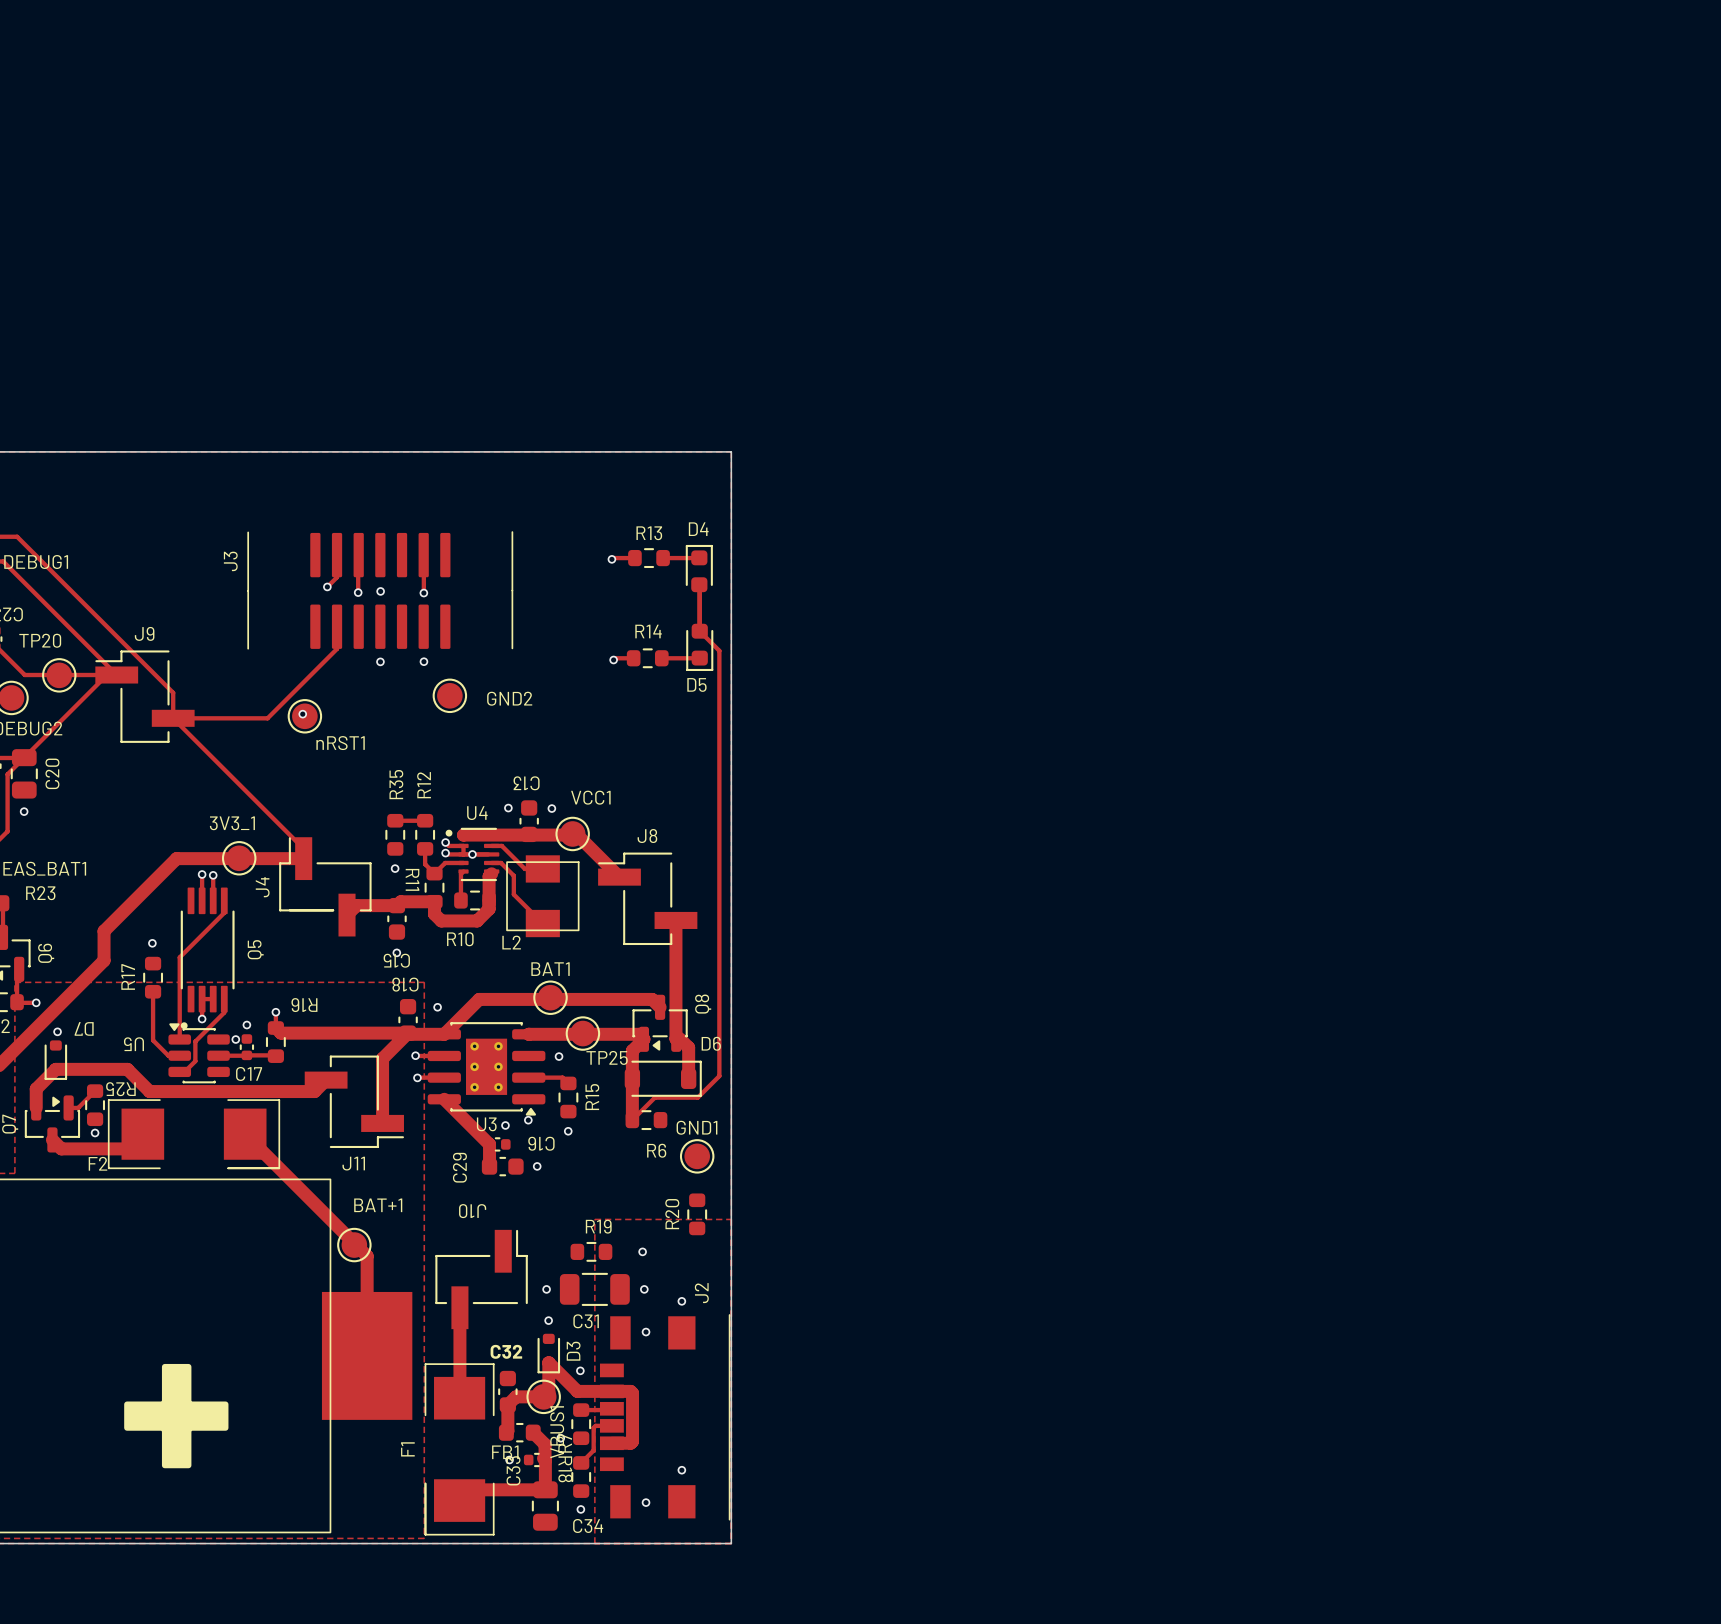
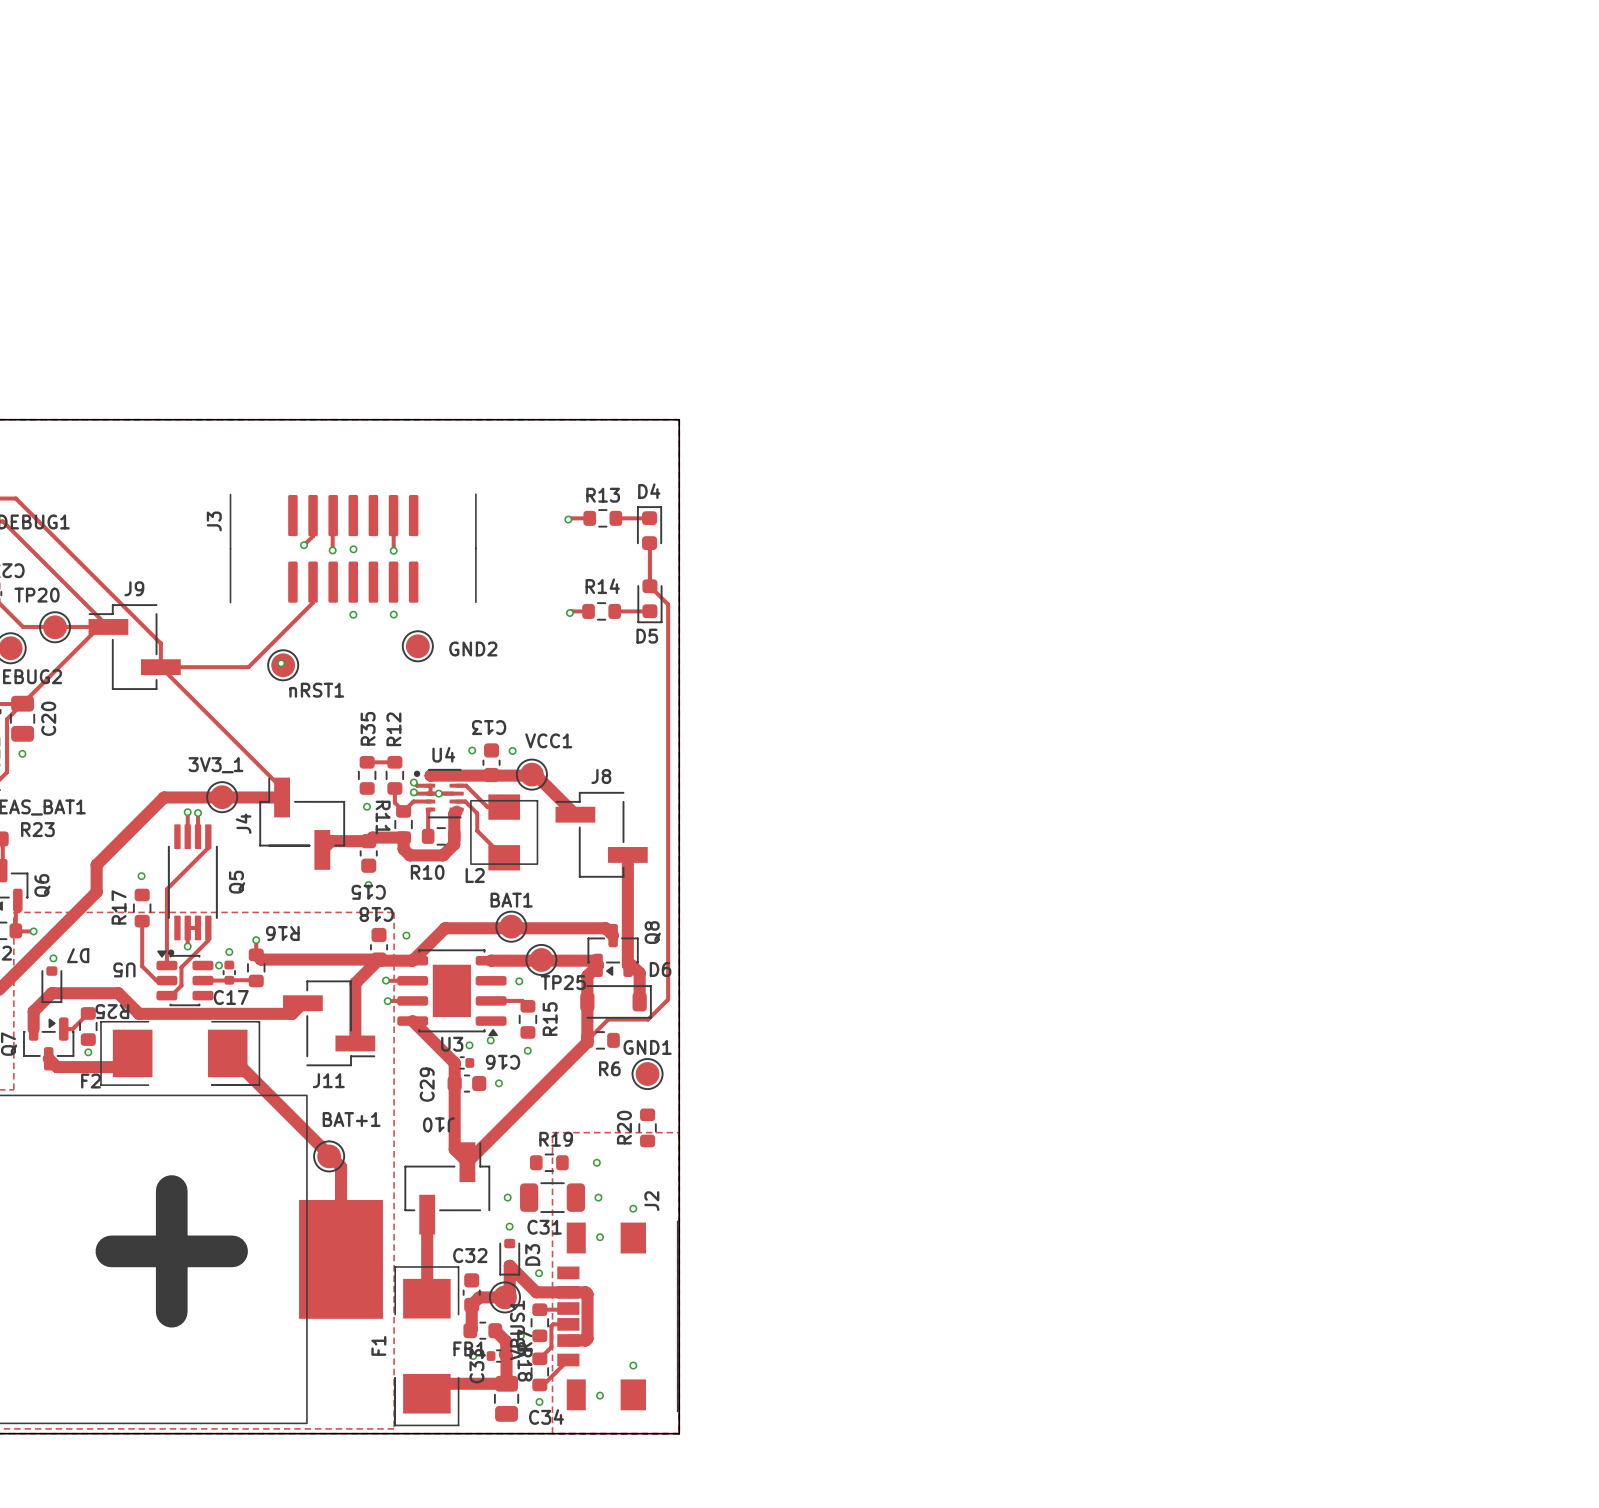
U3 footprint: [427, 1022, 546, 1116] -> [397, 949, 507, 1037]
track: none -> (587, 1040) (467, 1162) (454, 1149) (454, 1083)
track: none -> (568, 1360) (543, 1384) (539, 1384)

